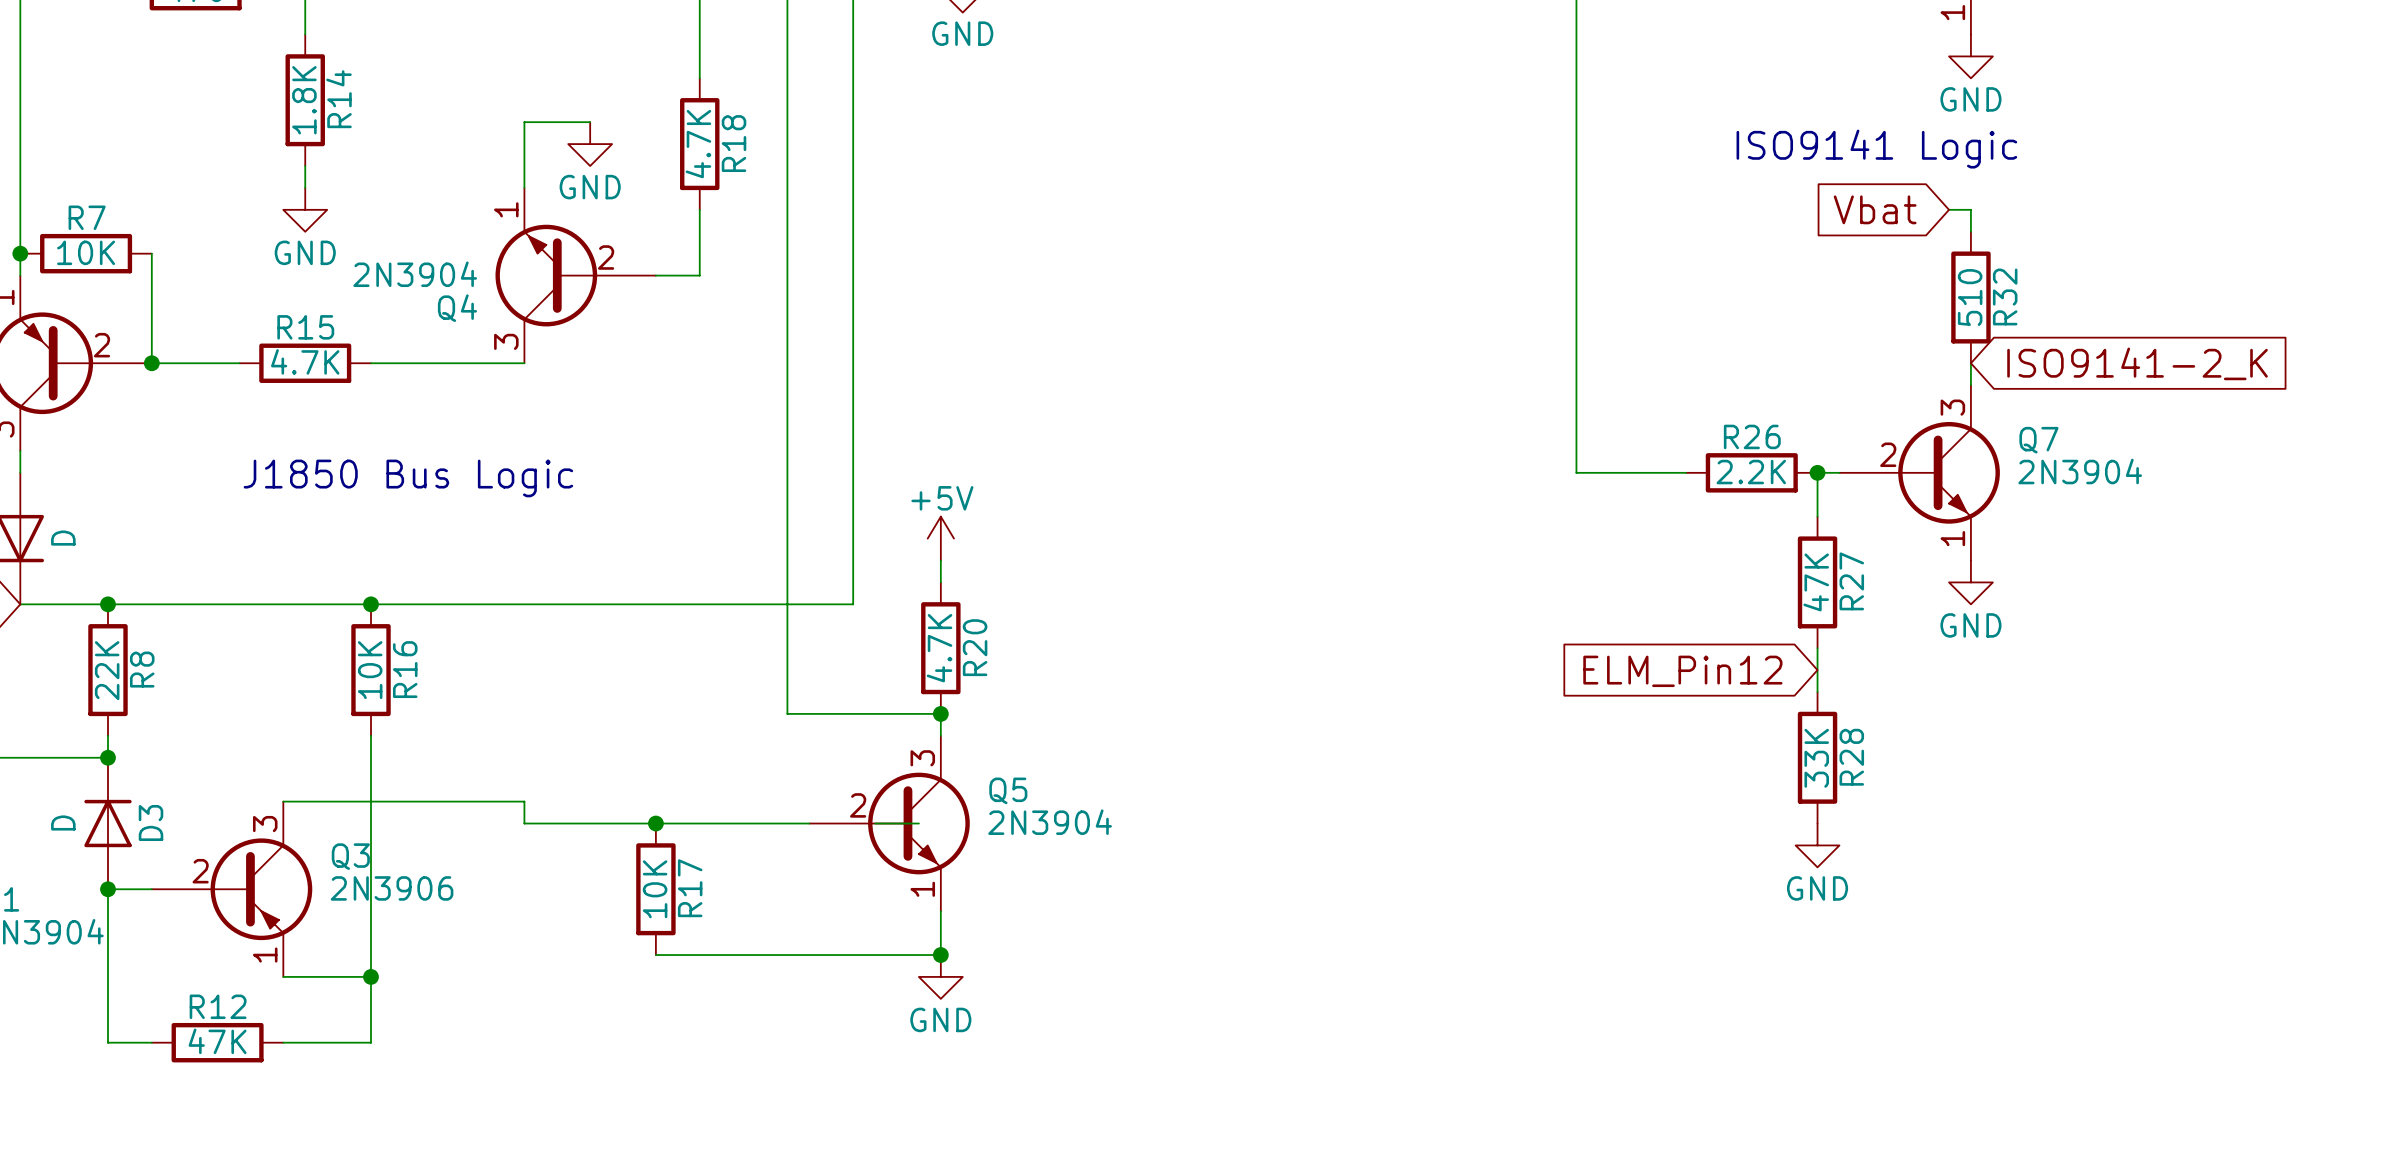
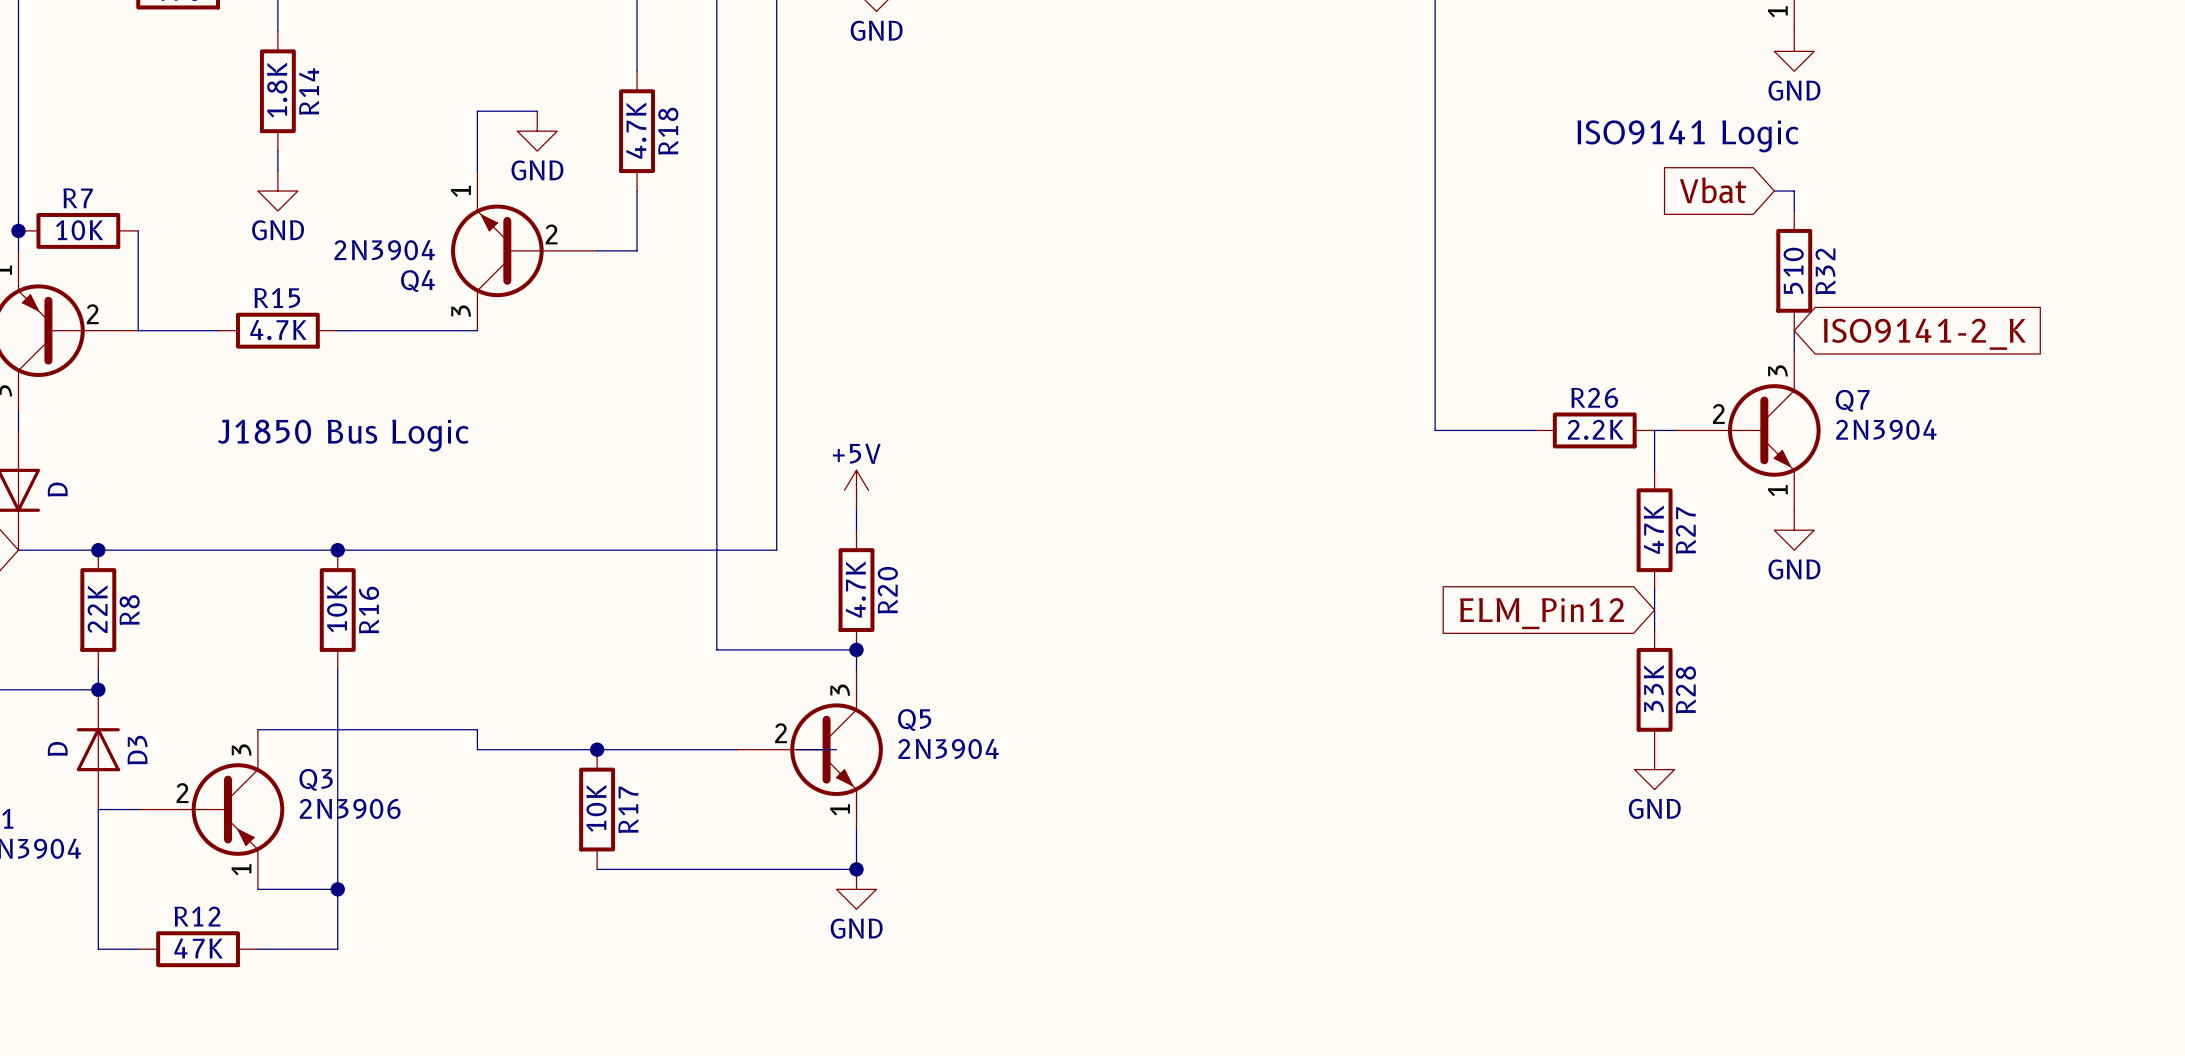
junction: (151, 363) -> none
junction: (1817, 472) -> none
junction: (107, 889) -> none

